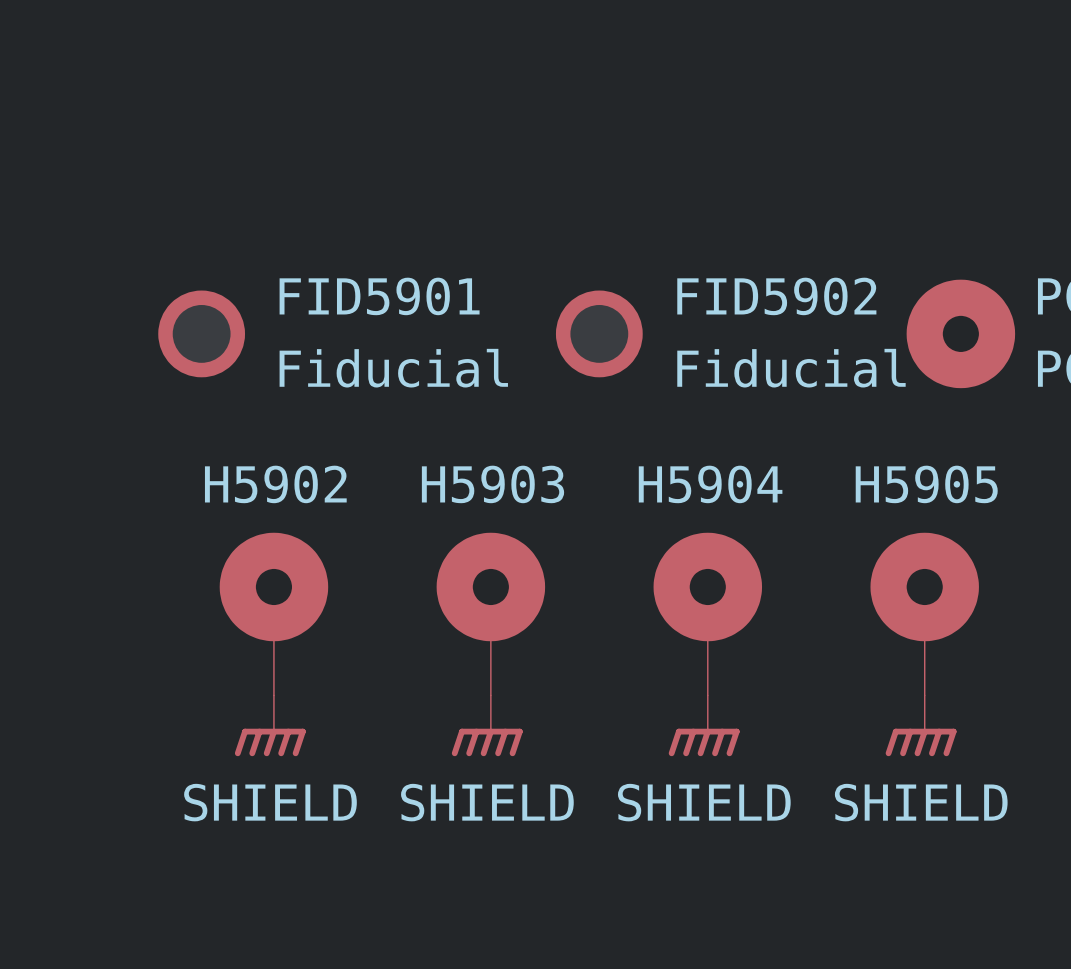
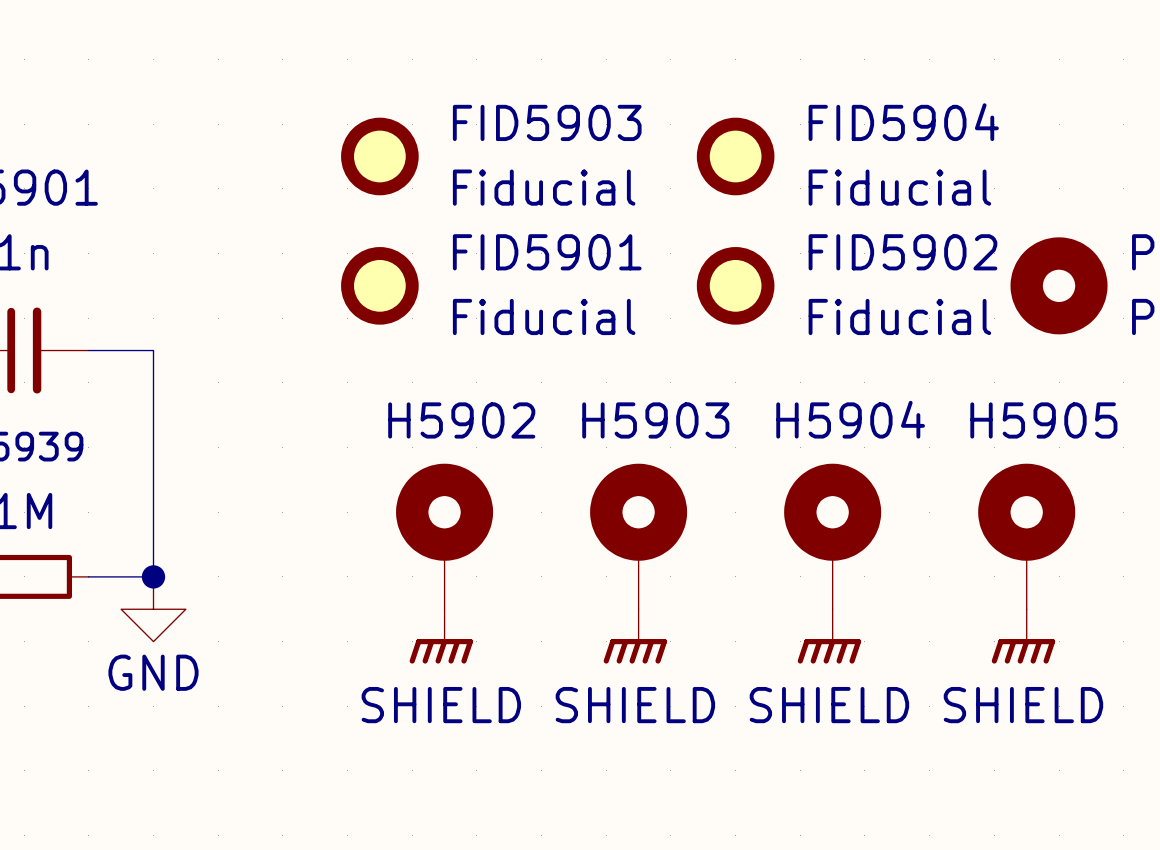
FID5903: none -> Fiducial (379, 156)
FID5904: none -> Fiducial (735, 156)

